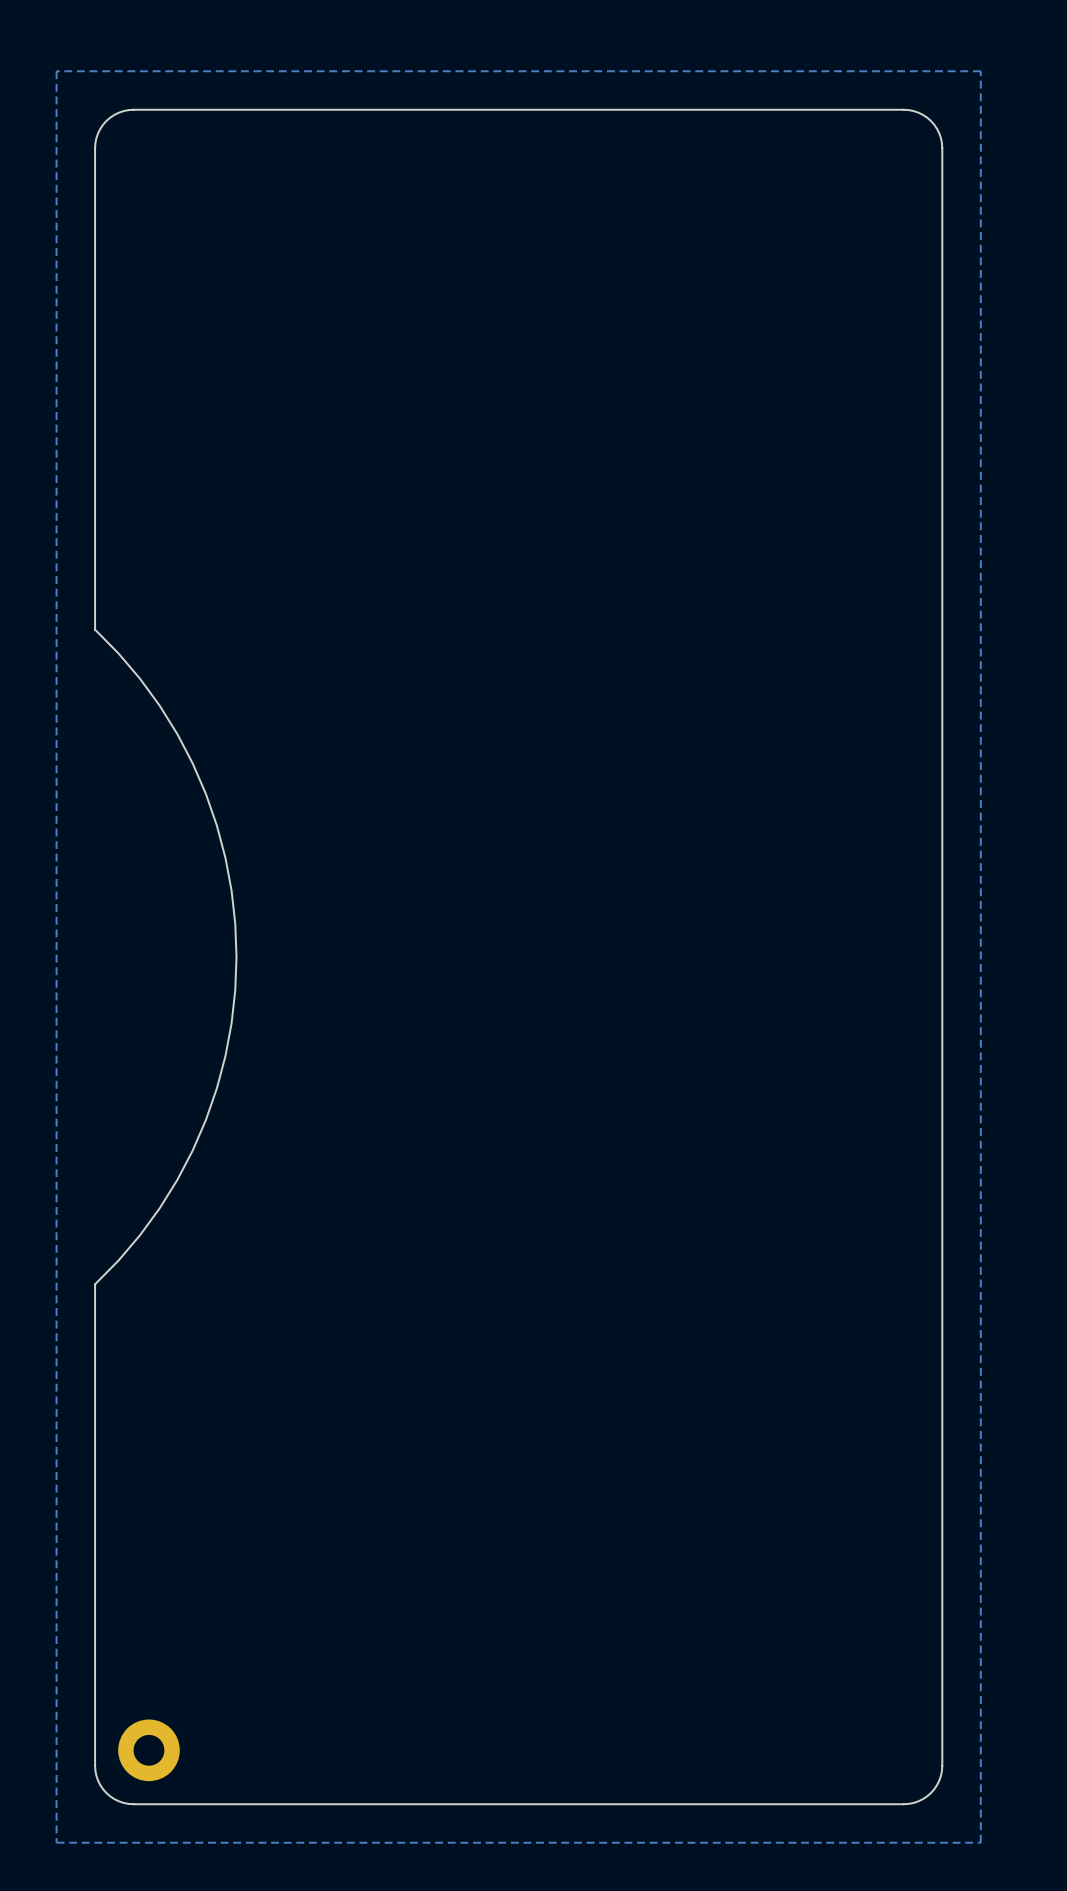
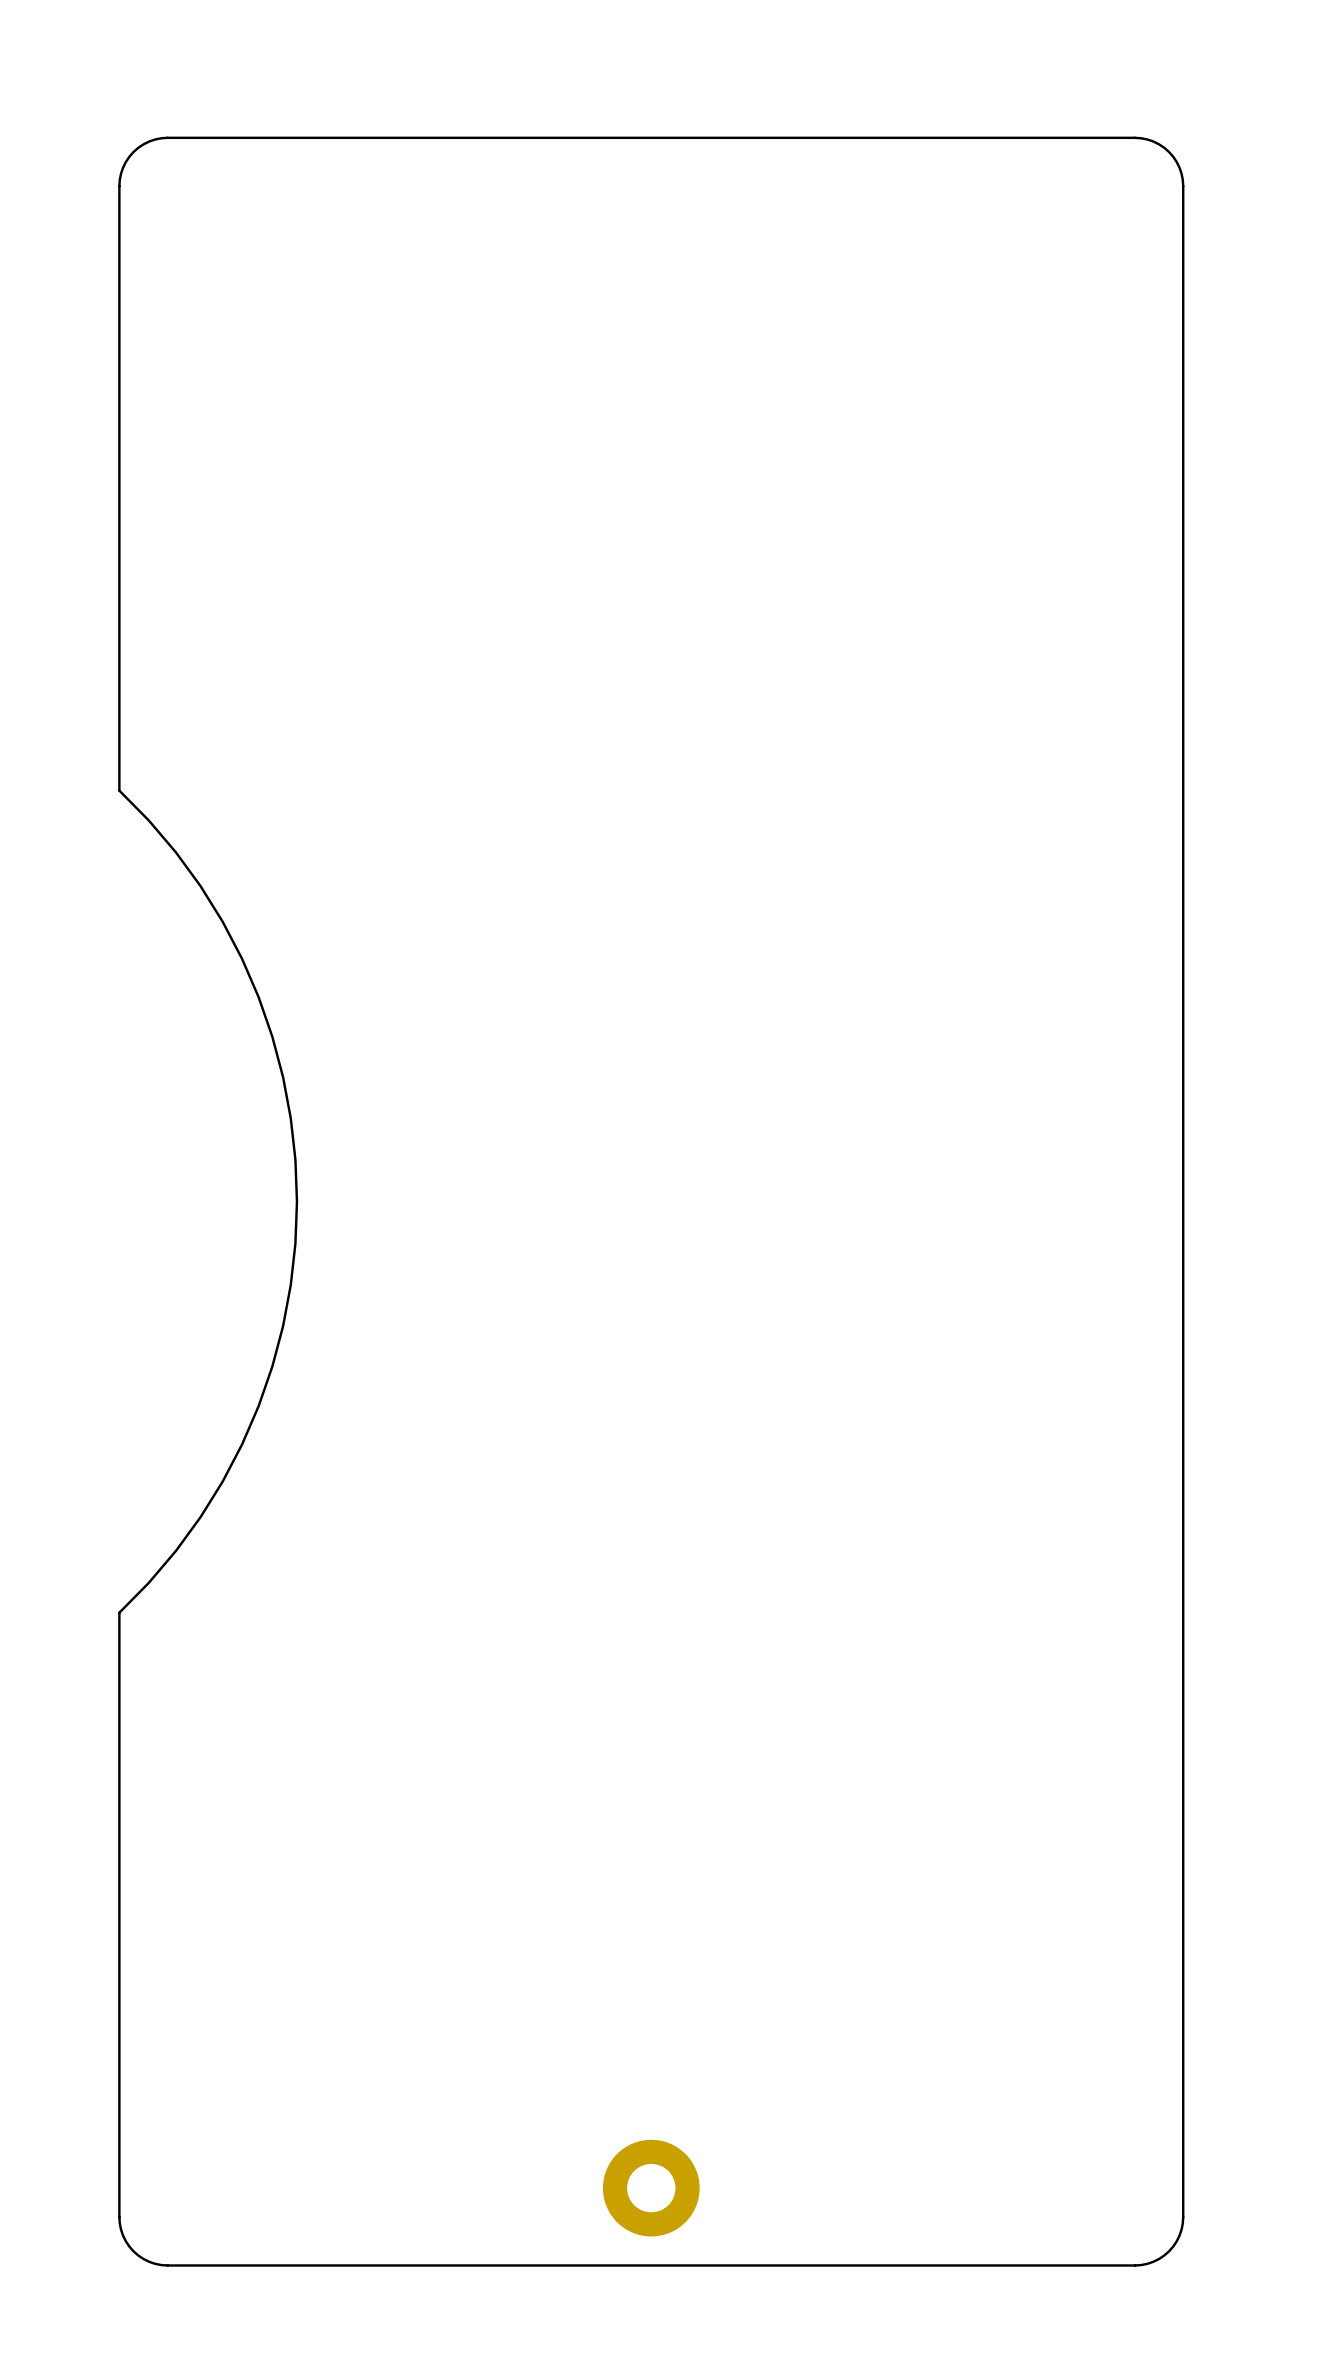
zone outline: (980, 71) (980, 1842) (56, 1842) (56, 71) (980, 71) -> none
part: none -> (651, 2188)
part: (148, 1750) -> none

